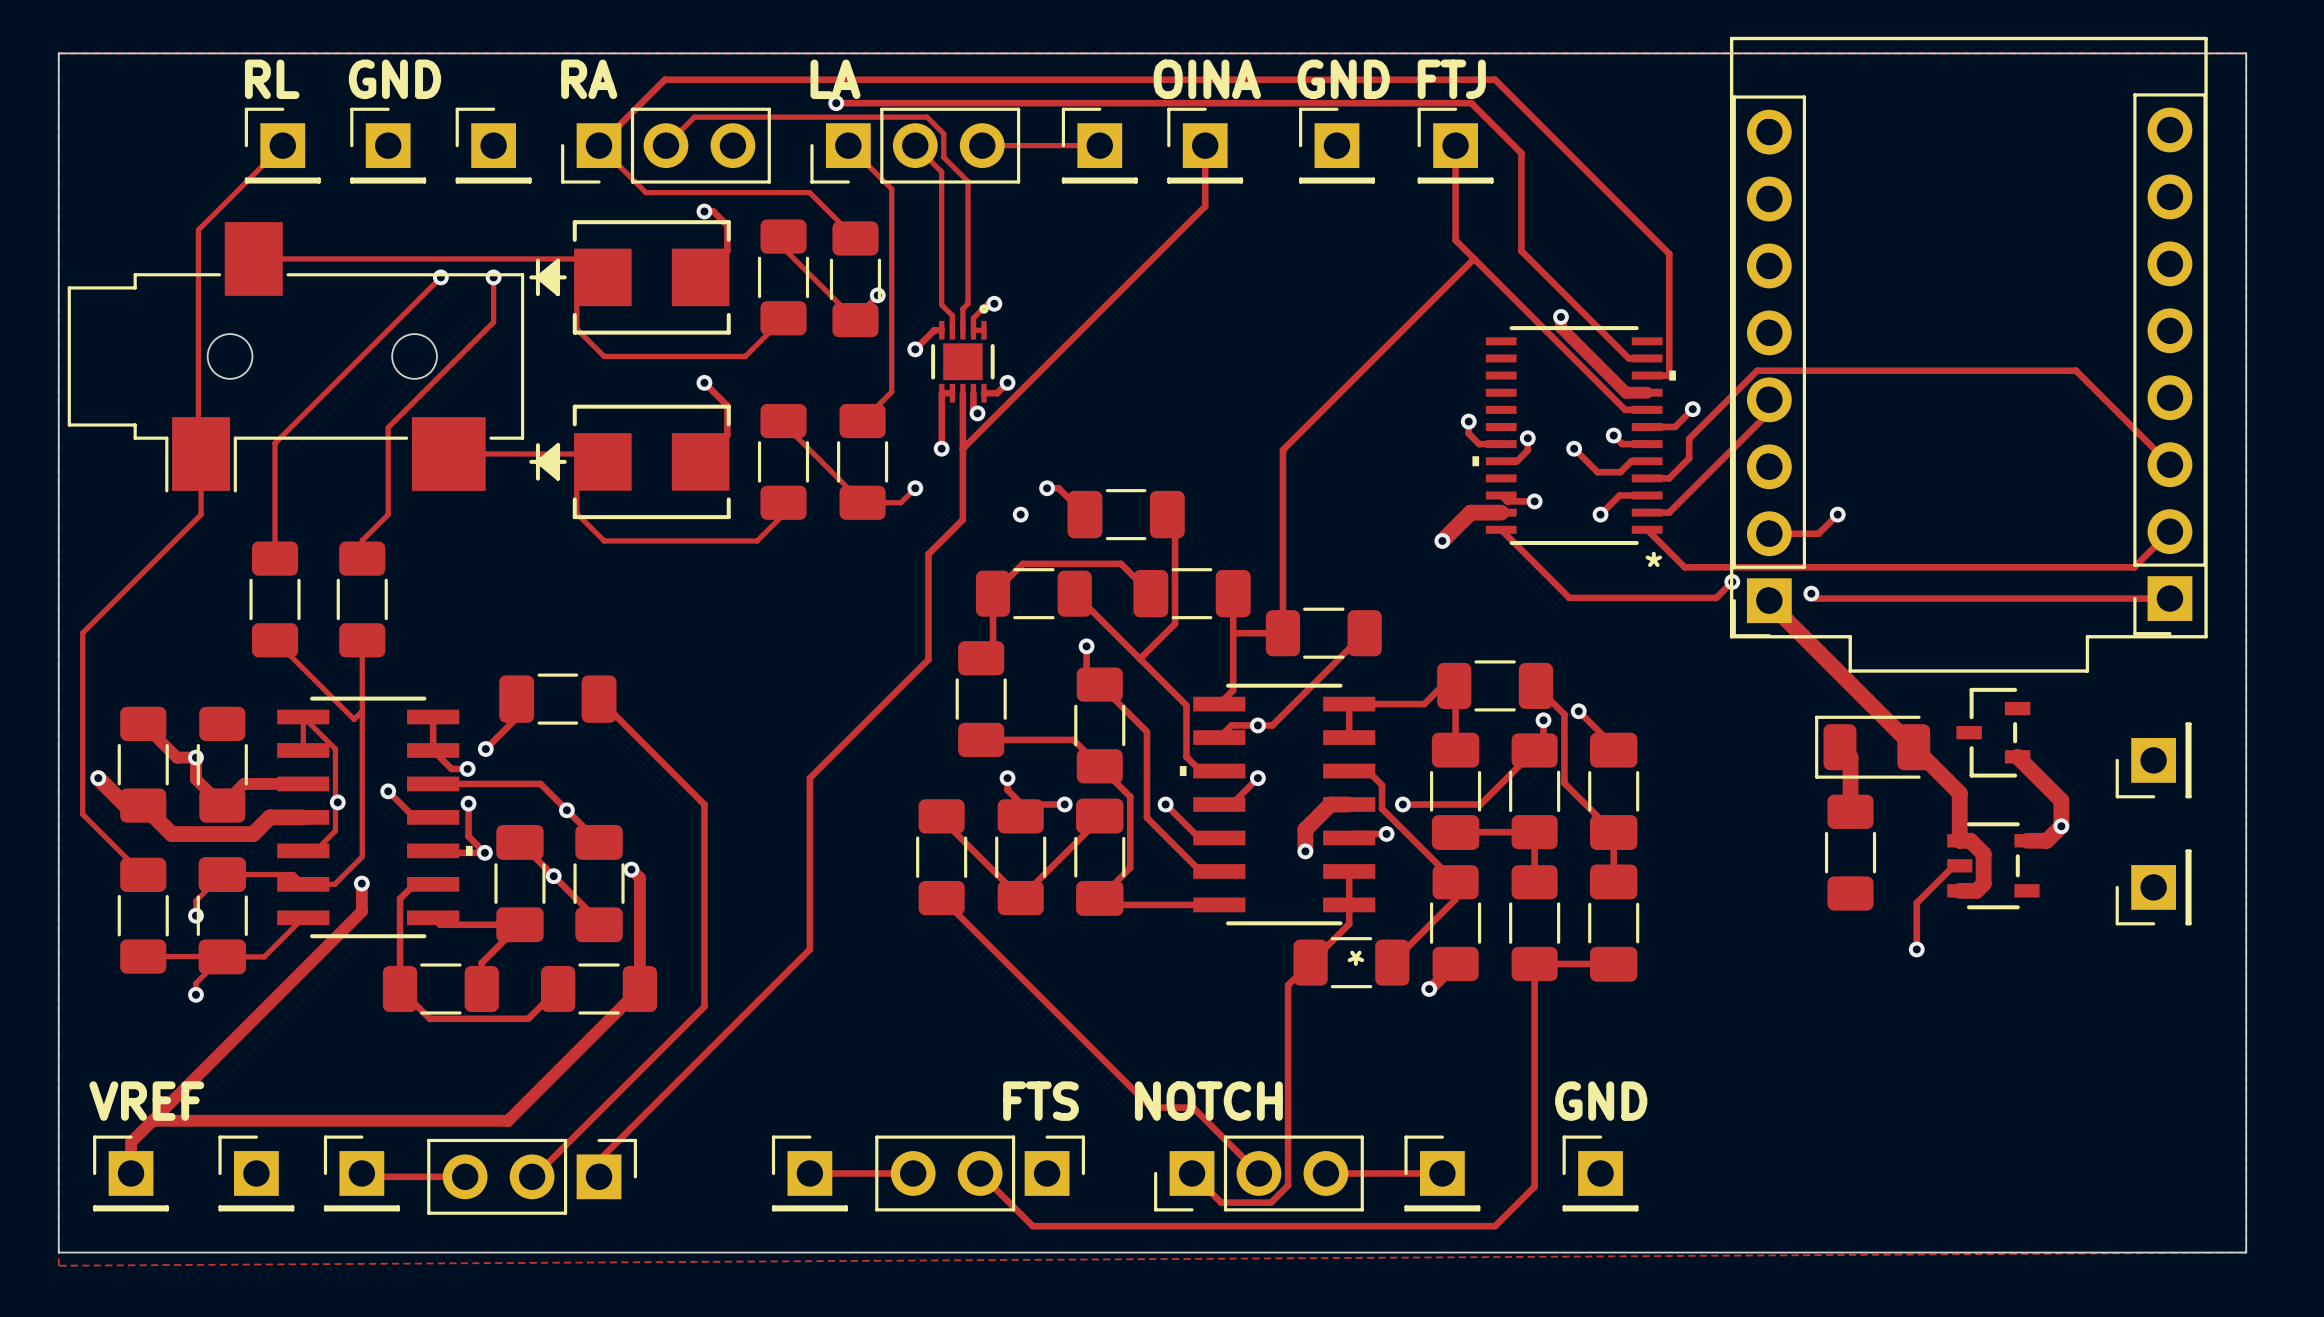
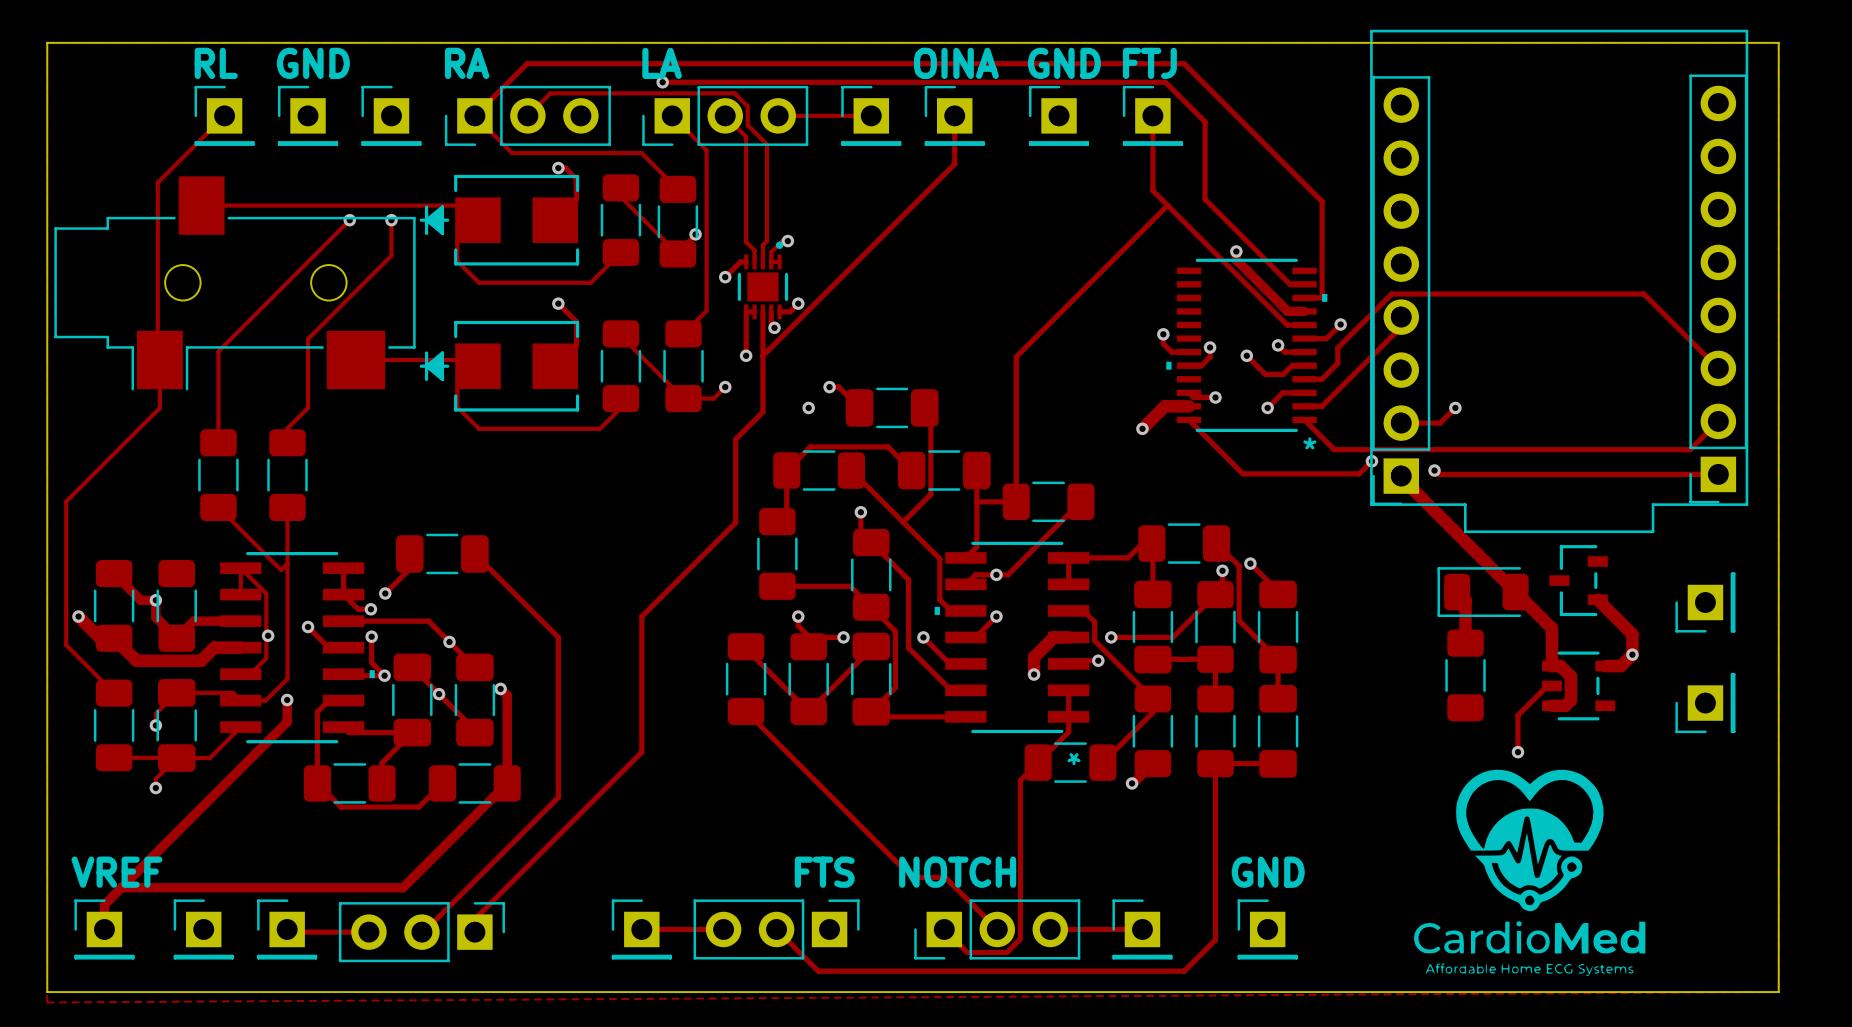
drawing: none -> [1414, 769, 1646, 977]

